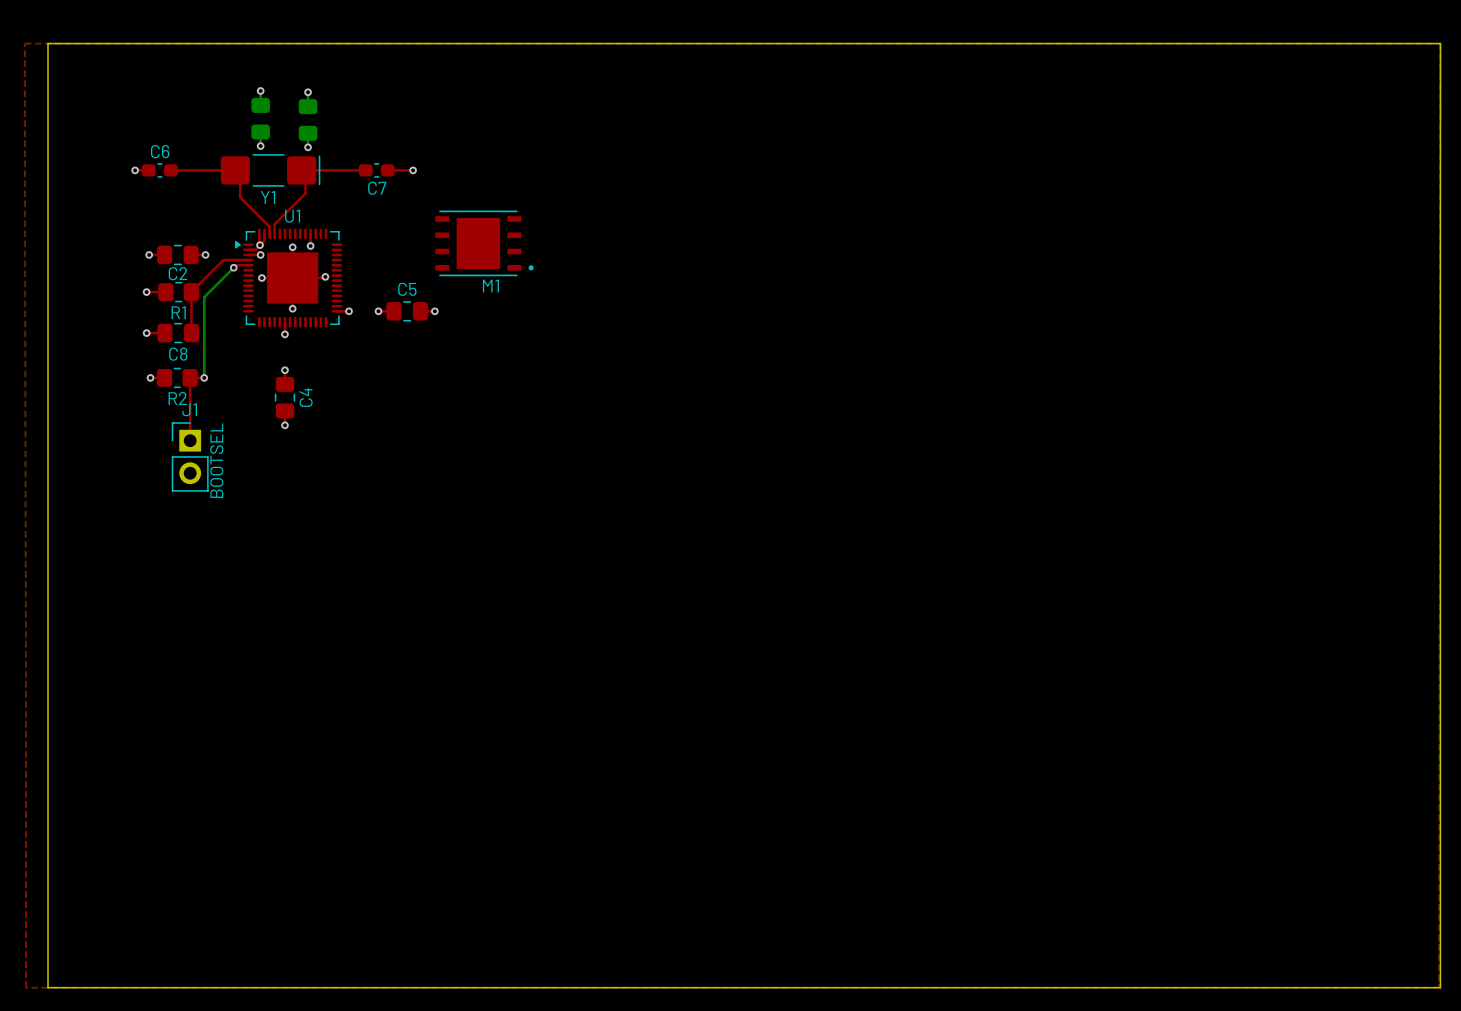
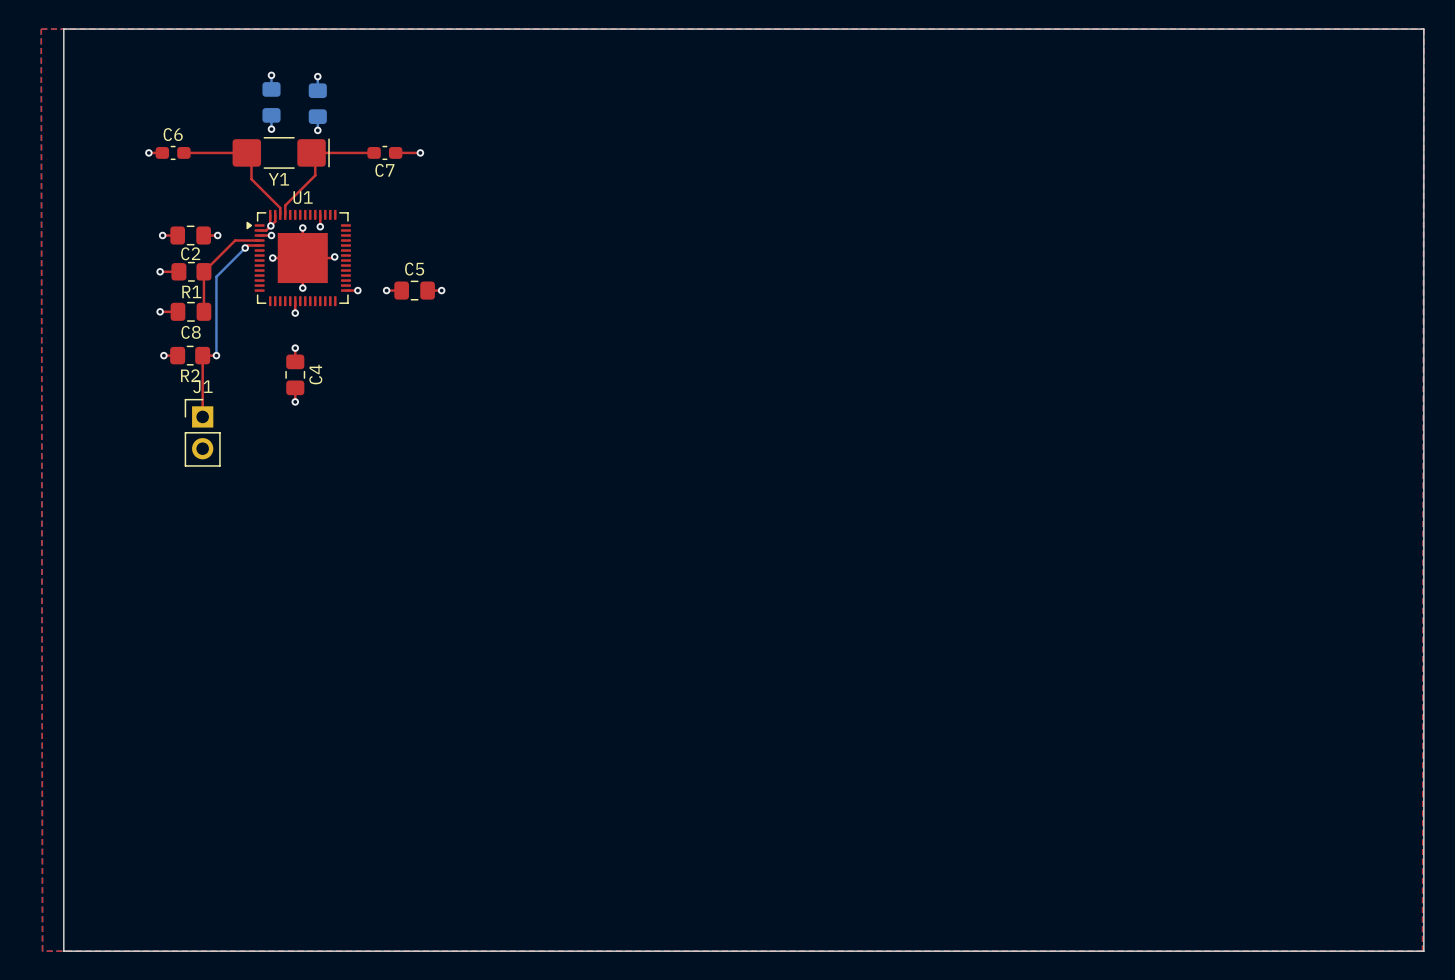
M1: (484, 243) -> none
text: BOOTSEL (216, 460) -> none

